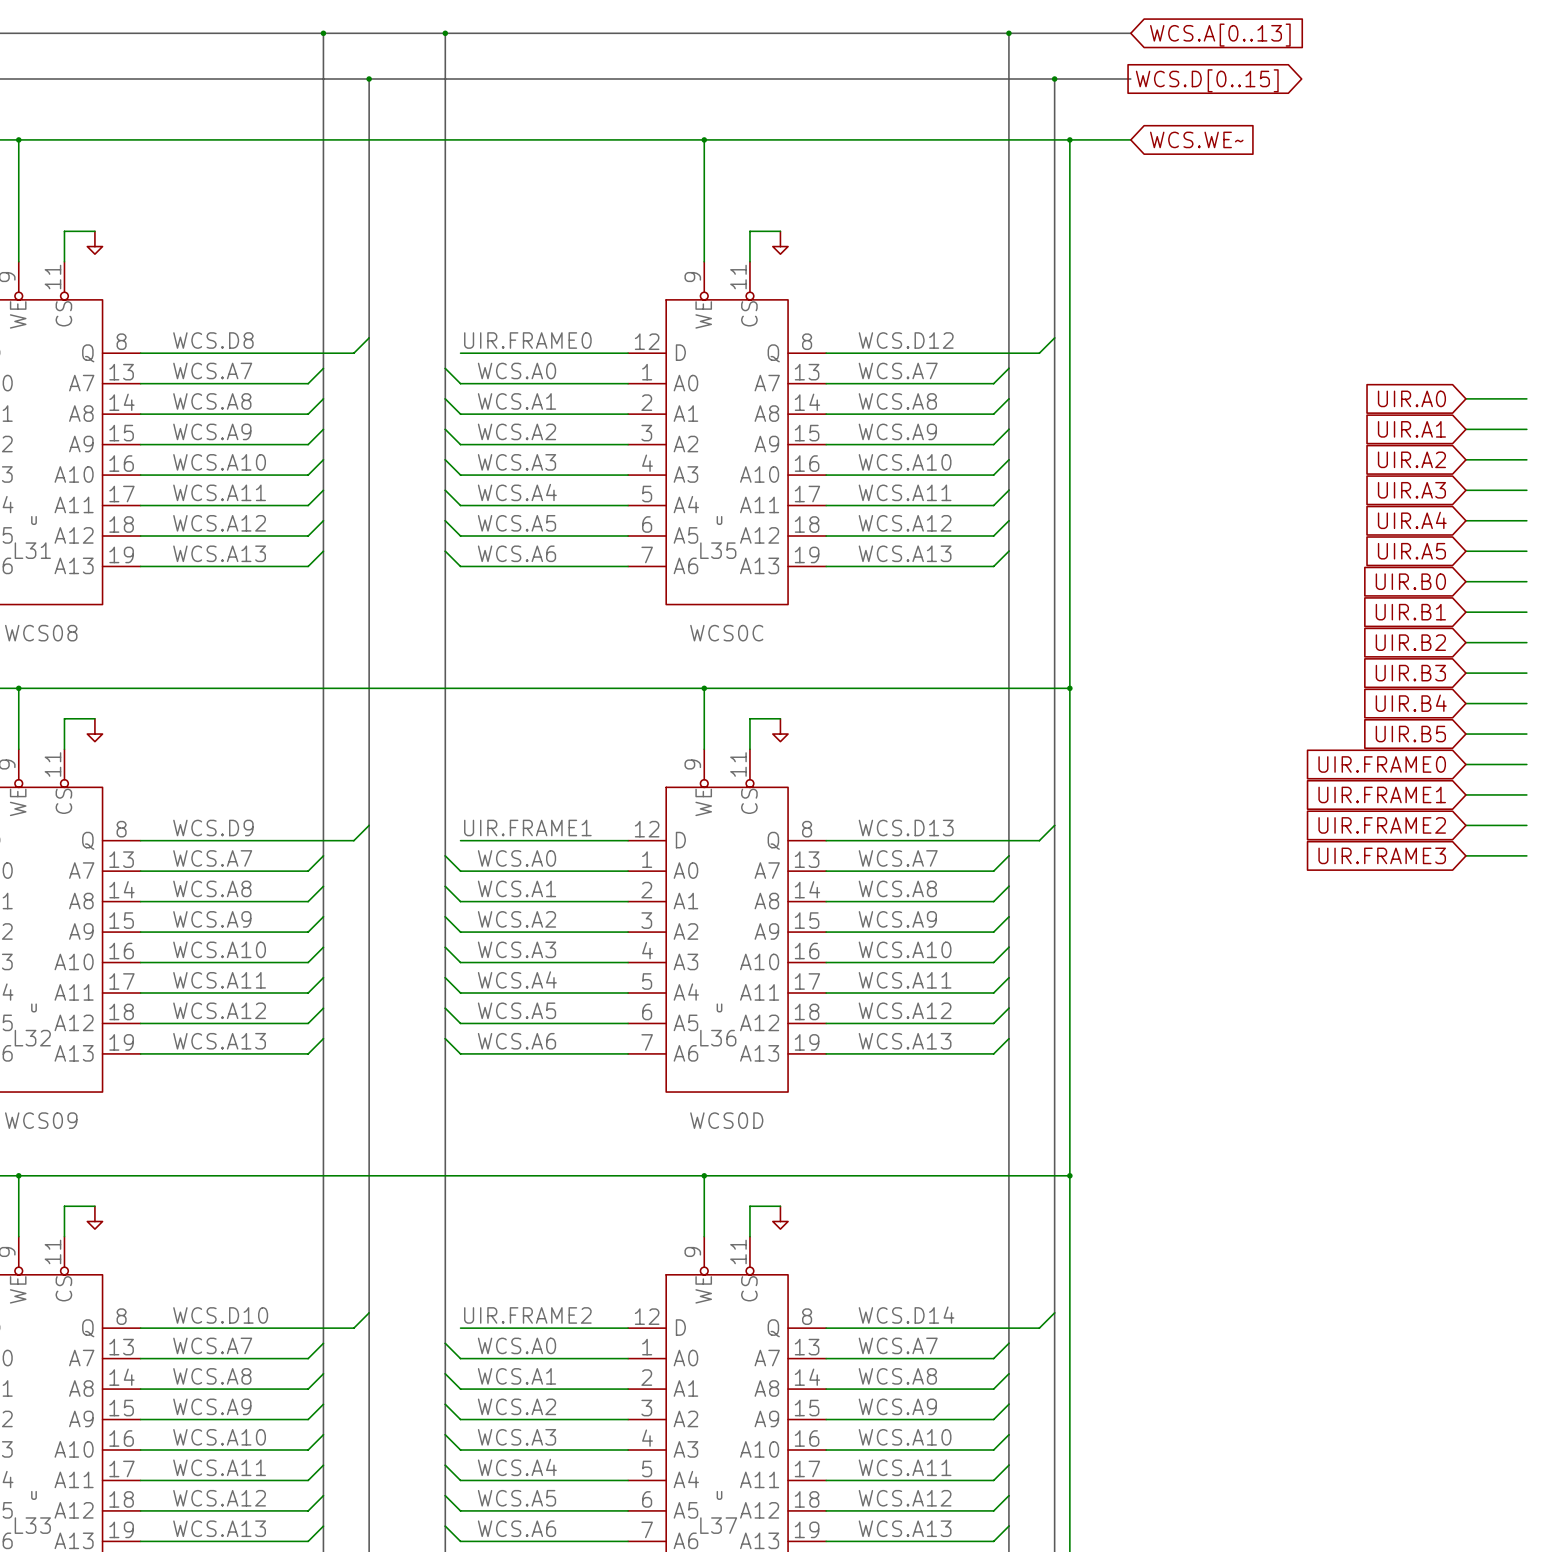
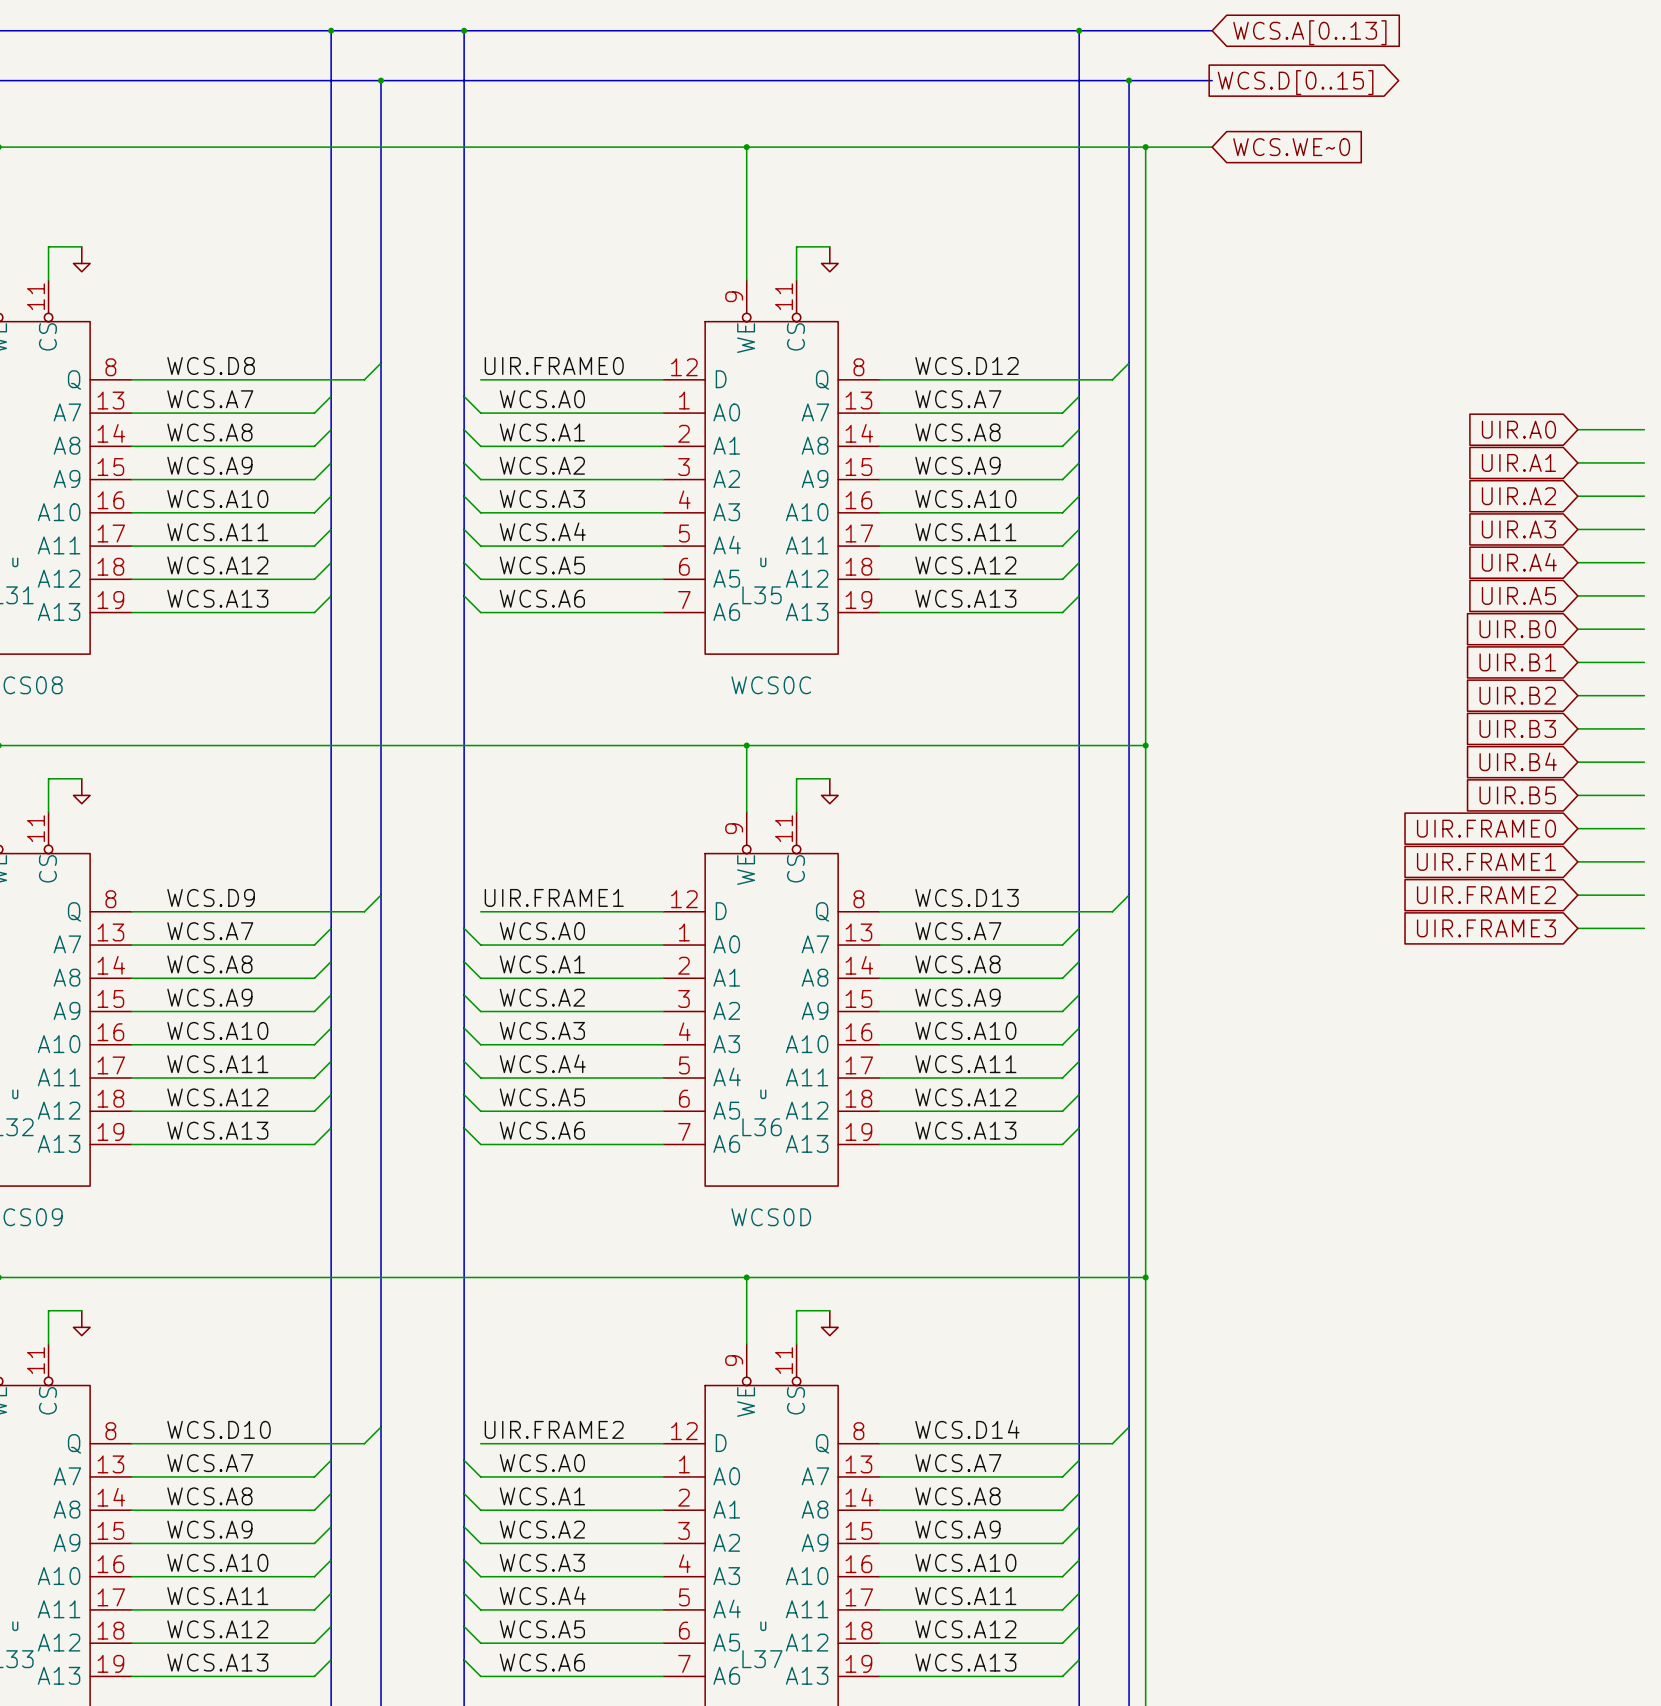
global label: WCS.WE~ (1196, 139) -> WCS.WE~0 (1291, 147)

